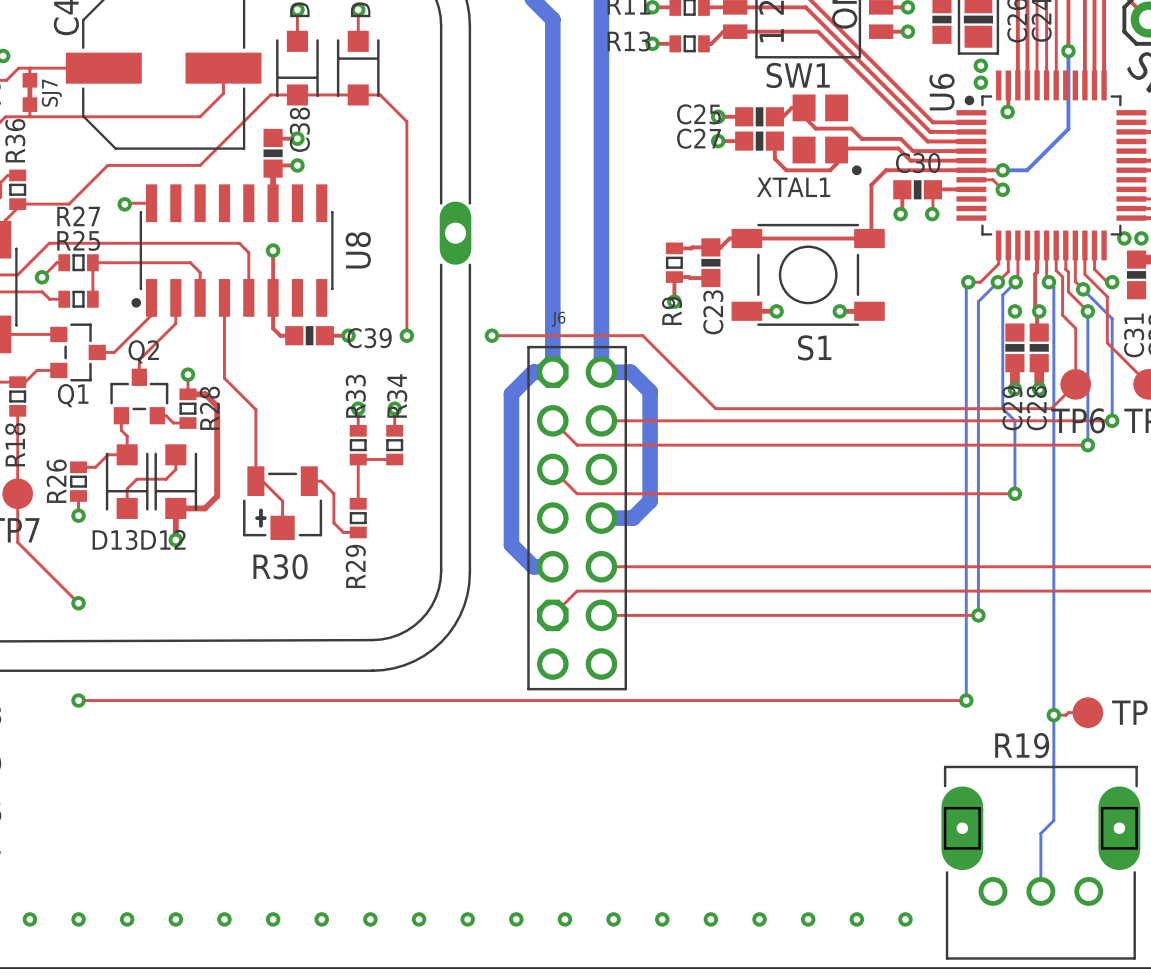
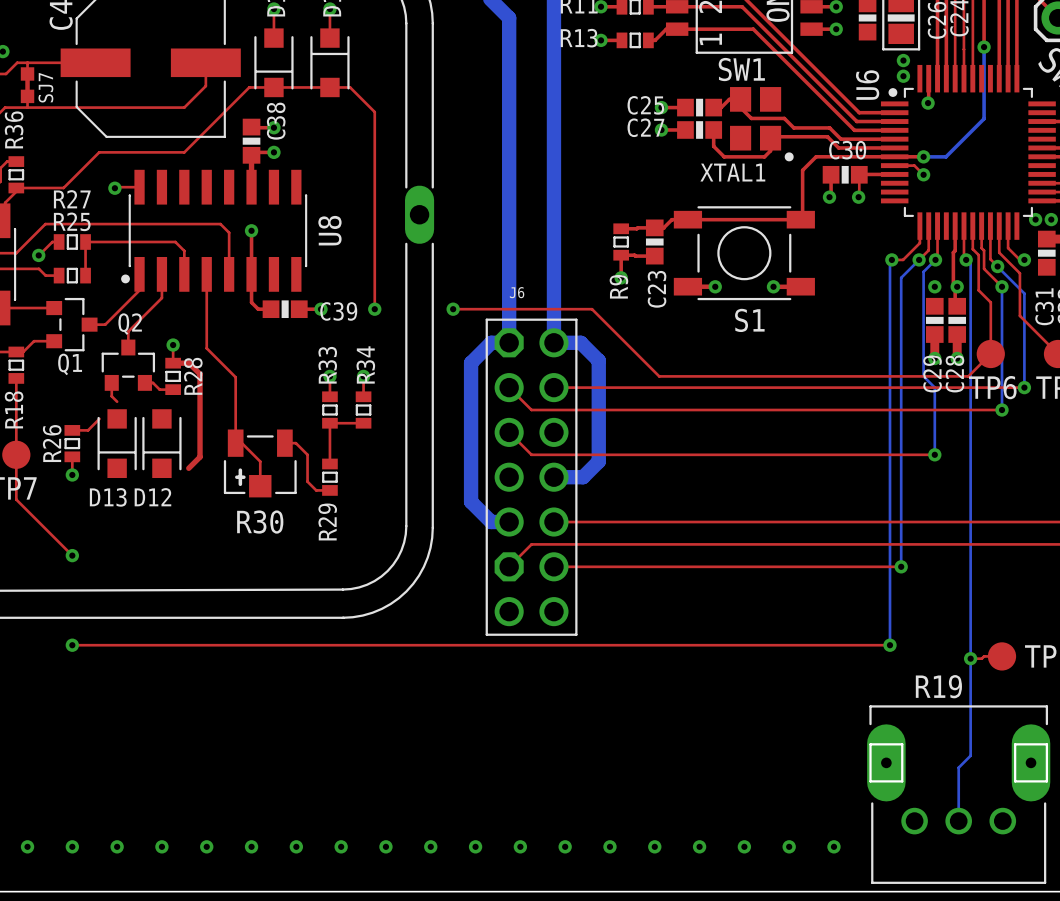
top track: (127, 436) (127, 454) (108, 454) -> none
top track: (175, 454) (175, 469) (166, 479) (136, 479) (127, 488) (127, 508) -> none
top track: (204, 508) (175, 508) (175, 540) -> none
via: (175, 540) -> none

